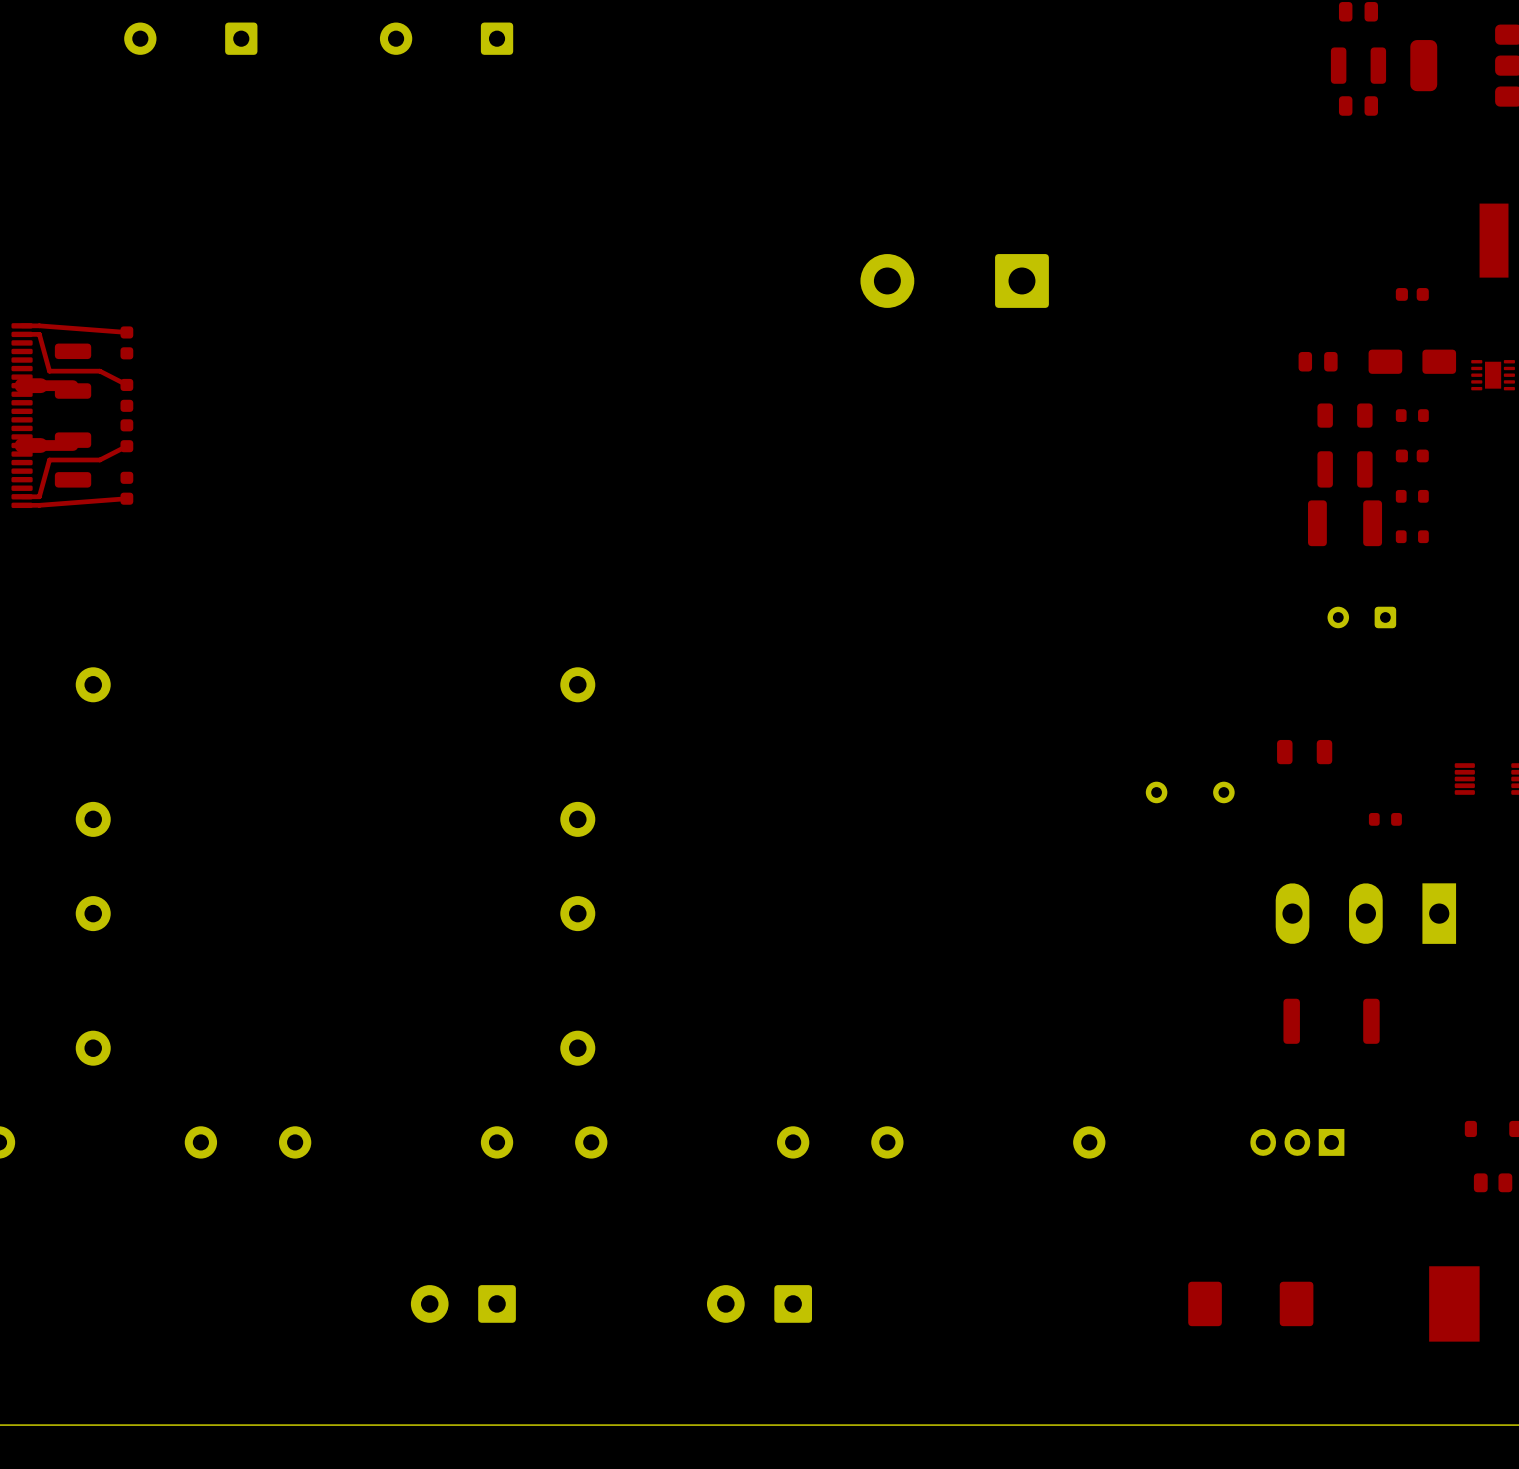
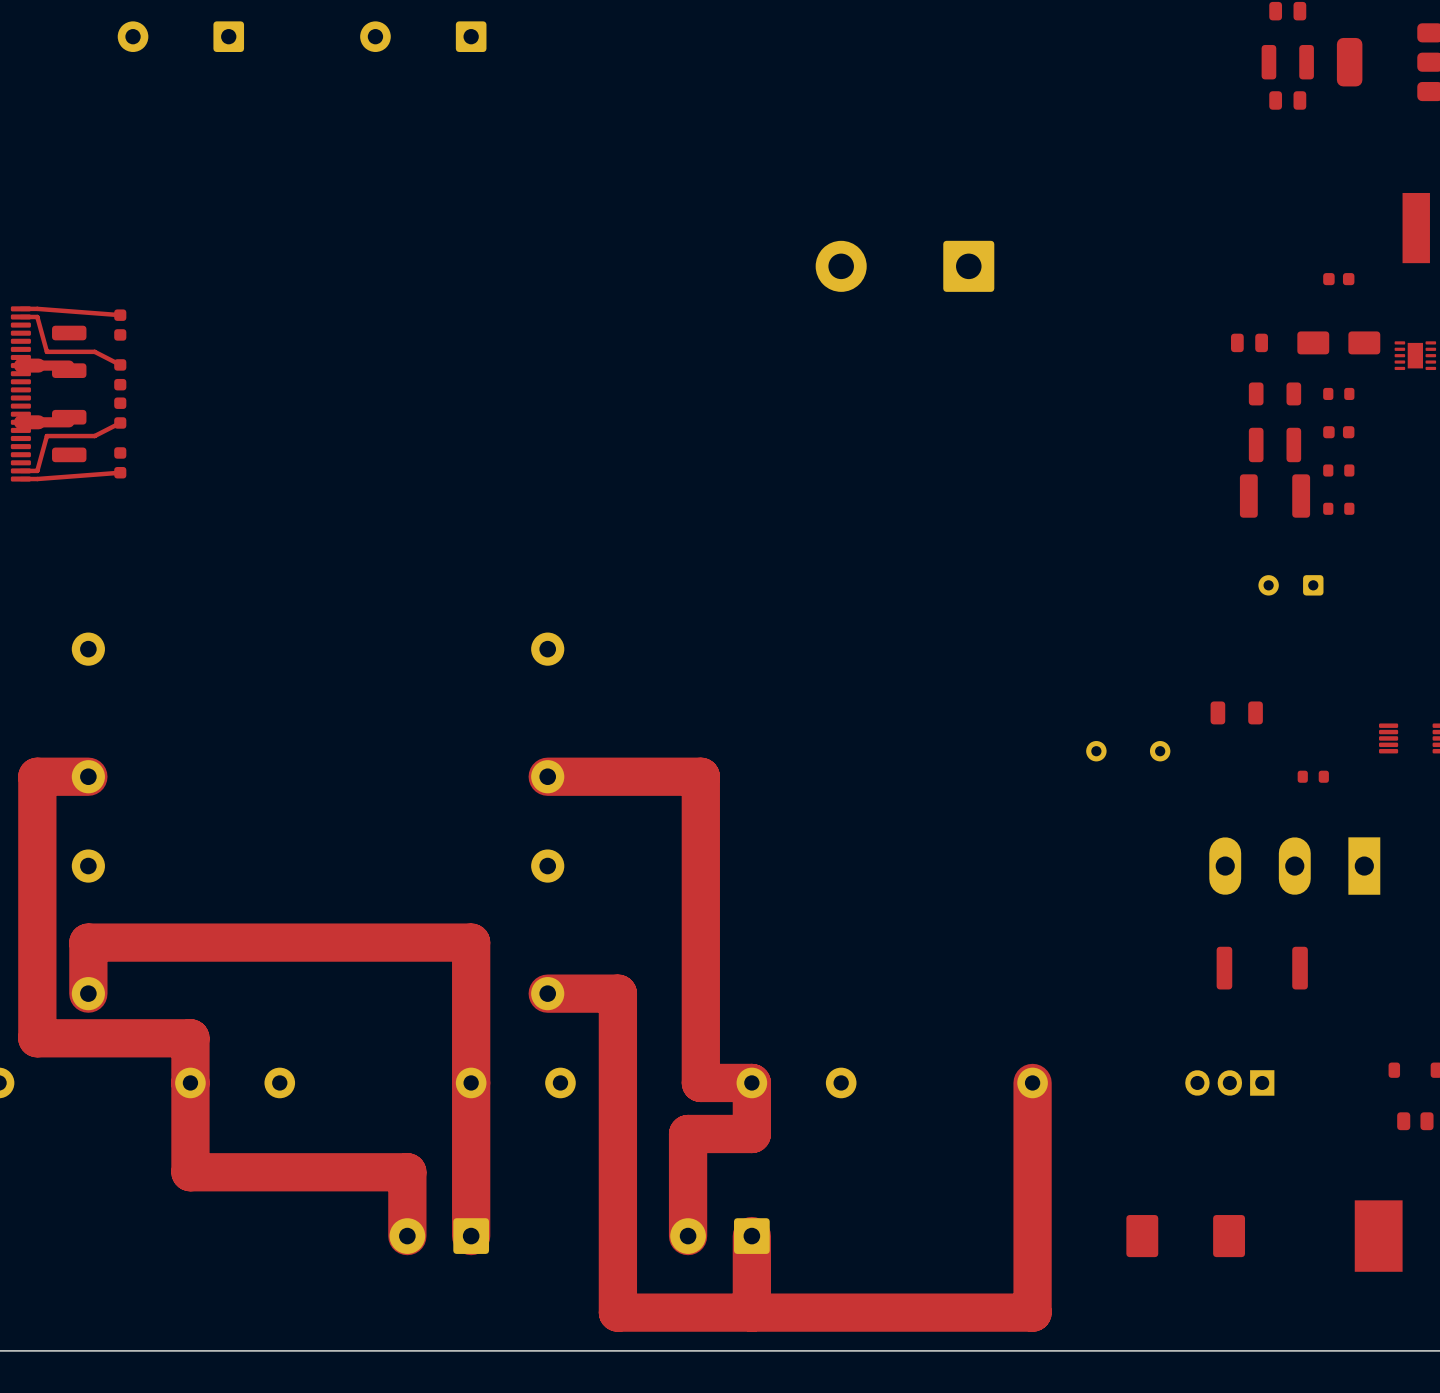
top track: none -> (88, 776) (37, 776) (37, 1038) (190, 1038) (190, 1172) (407, 1172) (407, 1236)
top track: none -> (547, 776) (700, 776) (700, 1082) (751, 1082) (751, 1133) (688, 1133) (688, 1236)
top track: none -> (88, 993) (88, 942) (471, 942) (471, 1236)
top track: none -> (547, 993) (617, 993) (617, 1312) (1032, 1312) (1032, 1082)
top track: none -> (751, 1236) (751, 1312)

